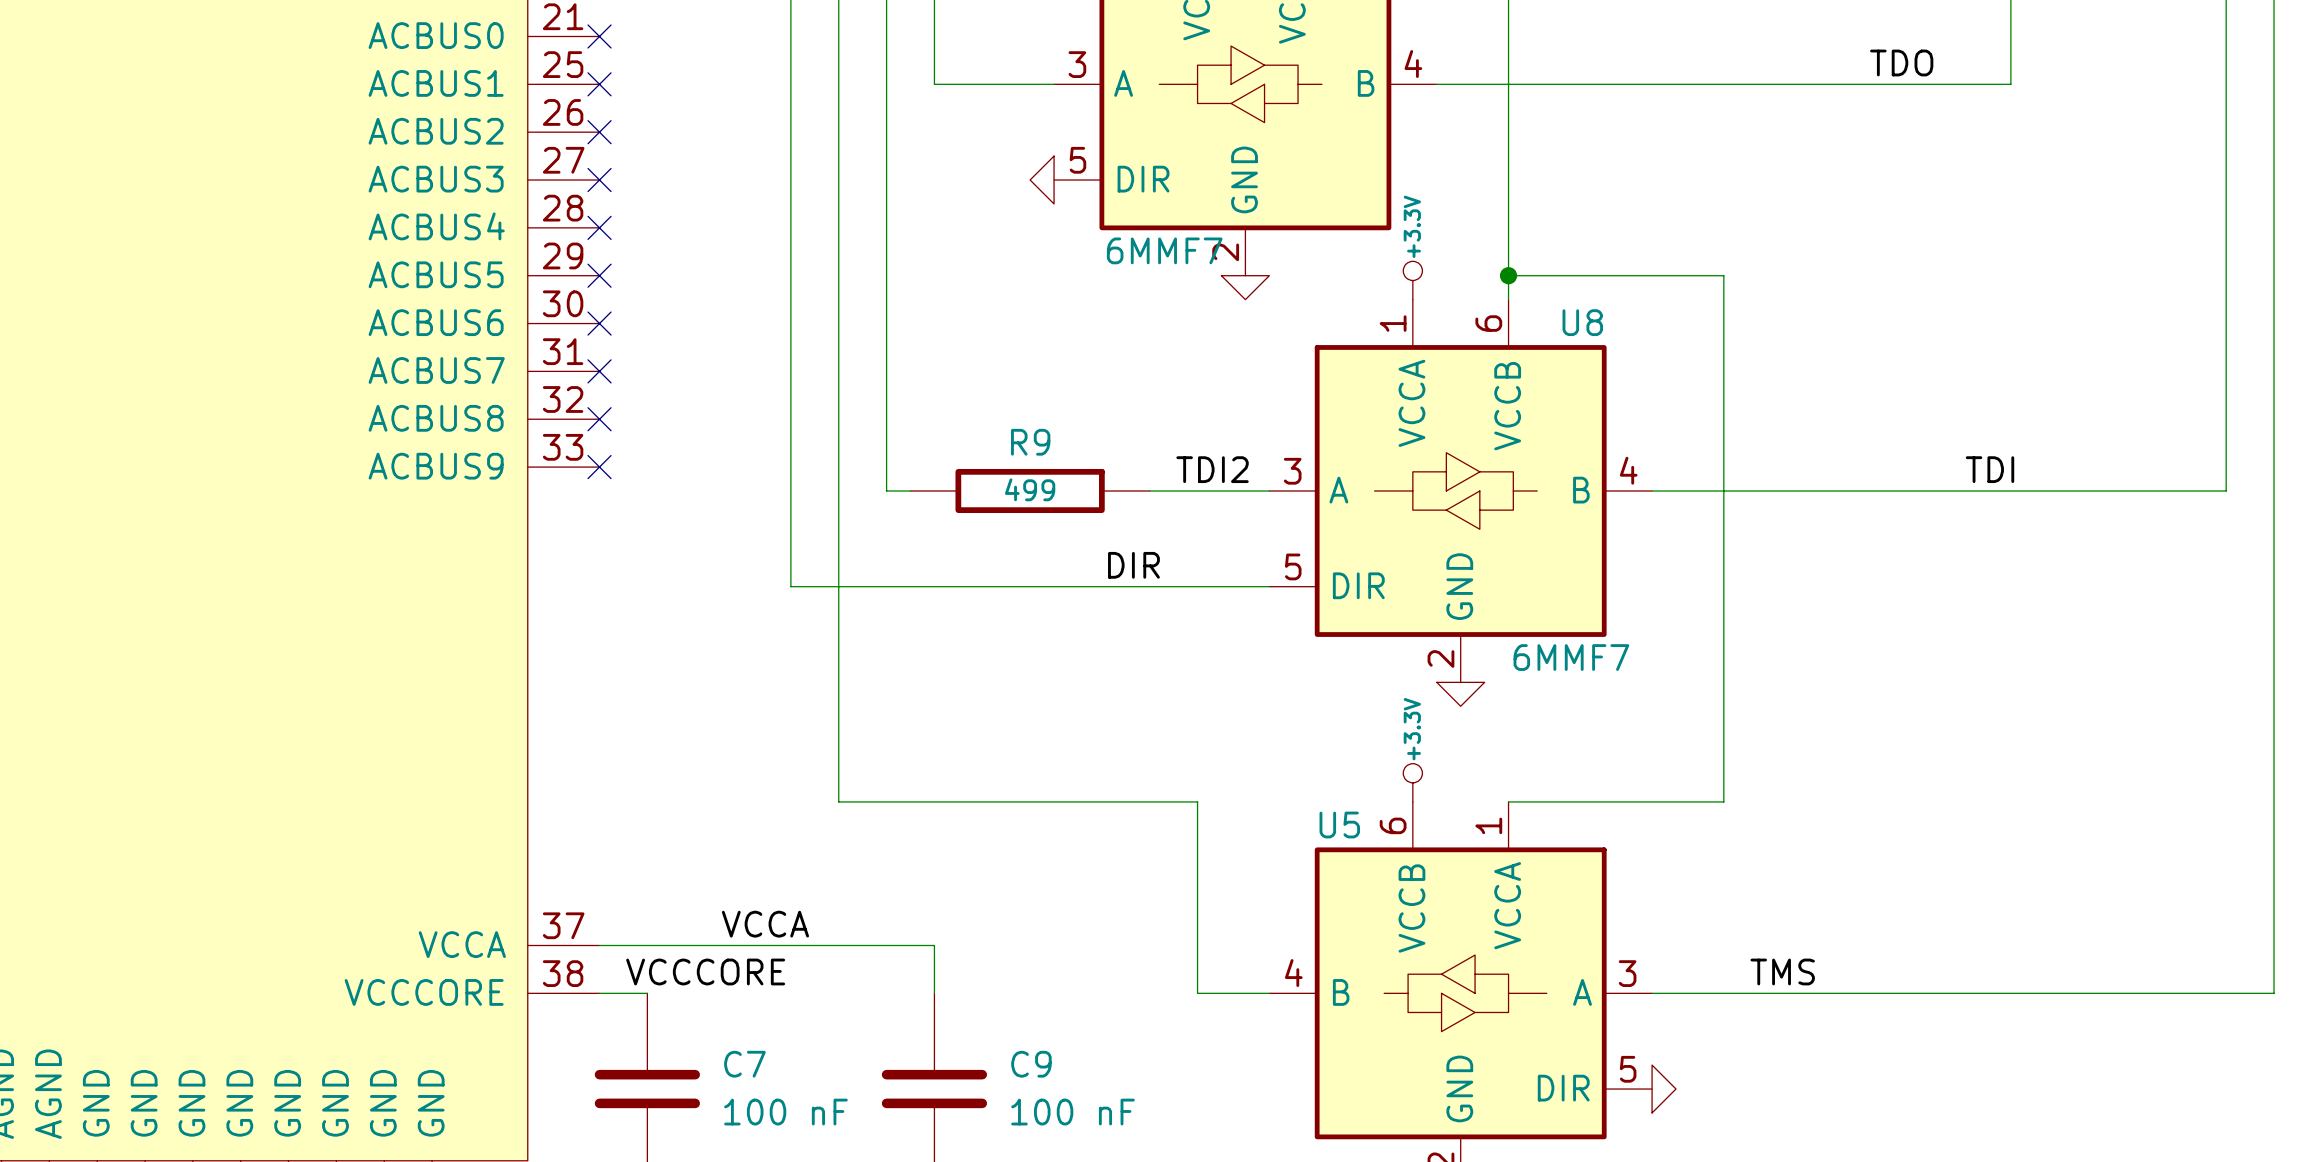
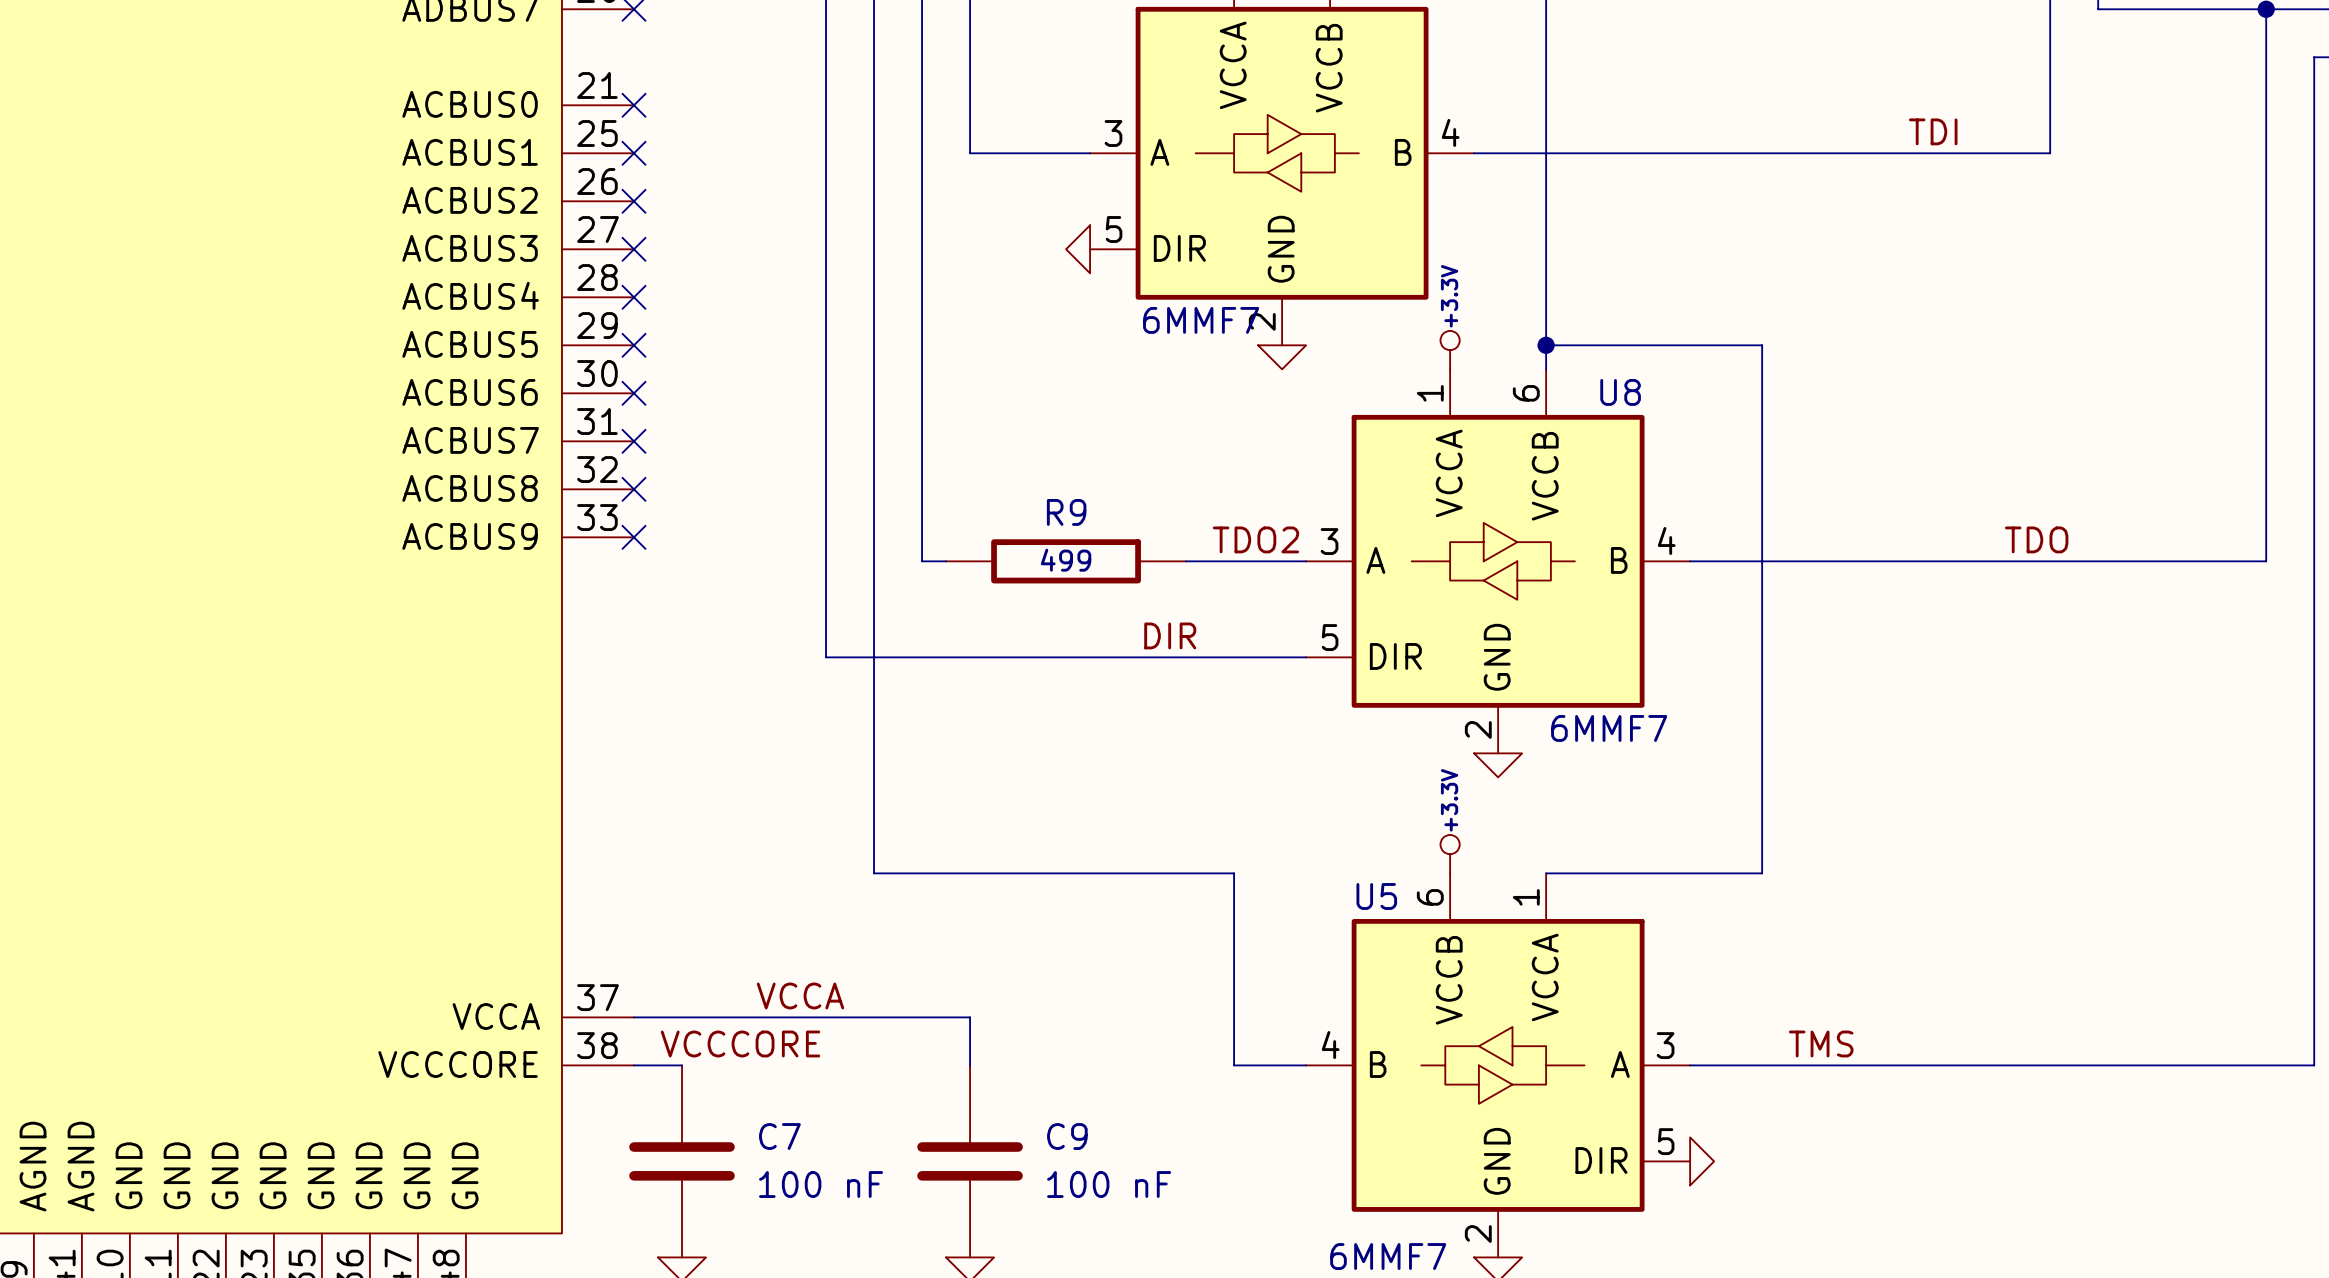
label: TDO (1901, 62) -> TDI (1933, 131)
label: TDI2 (1212, 469) -> TDO2 (1255, 539)
label: TDI (1989, 469) -> TDO (2036, 539)

